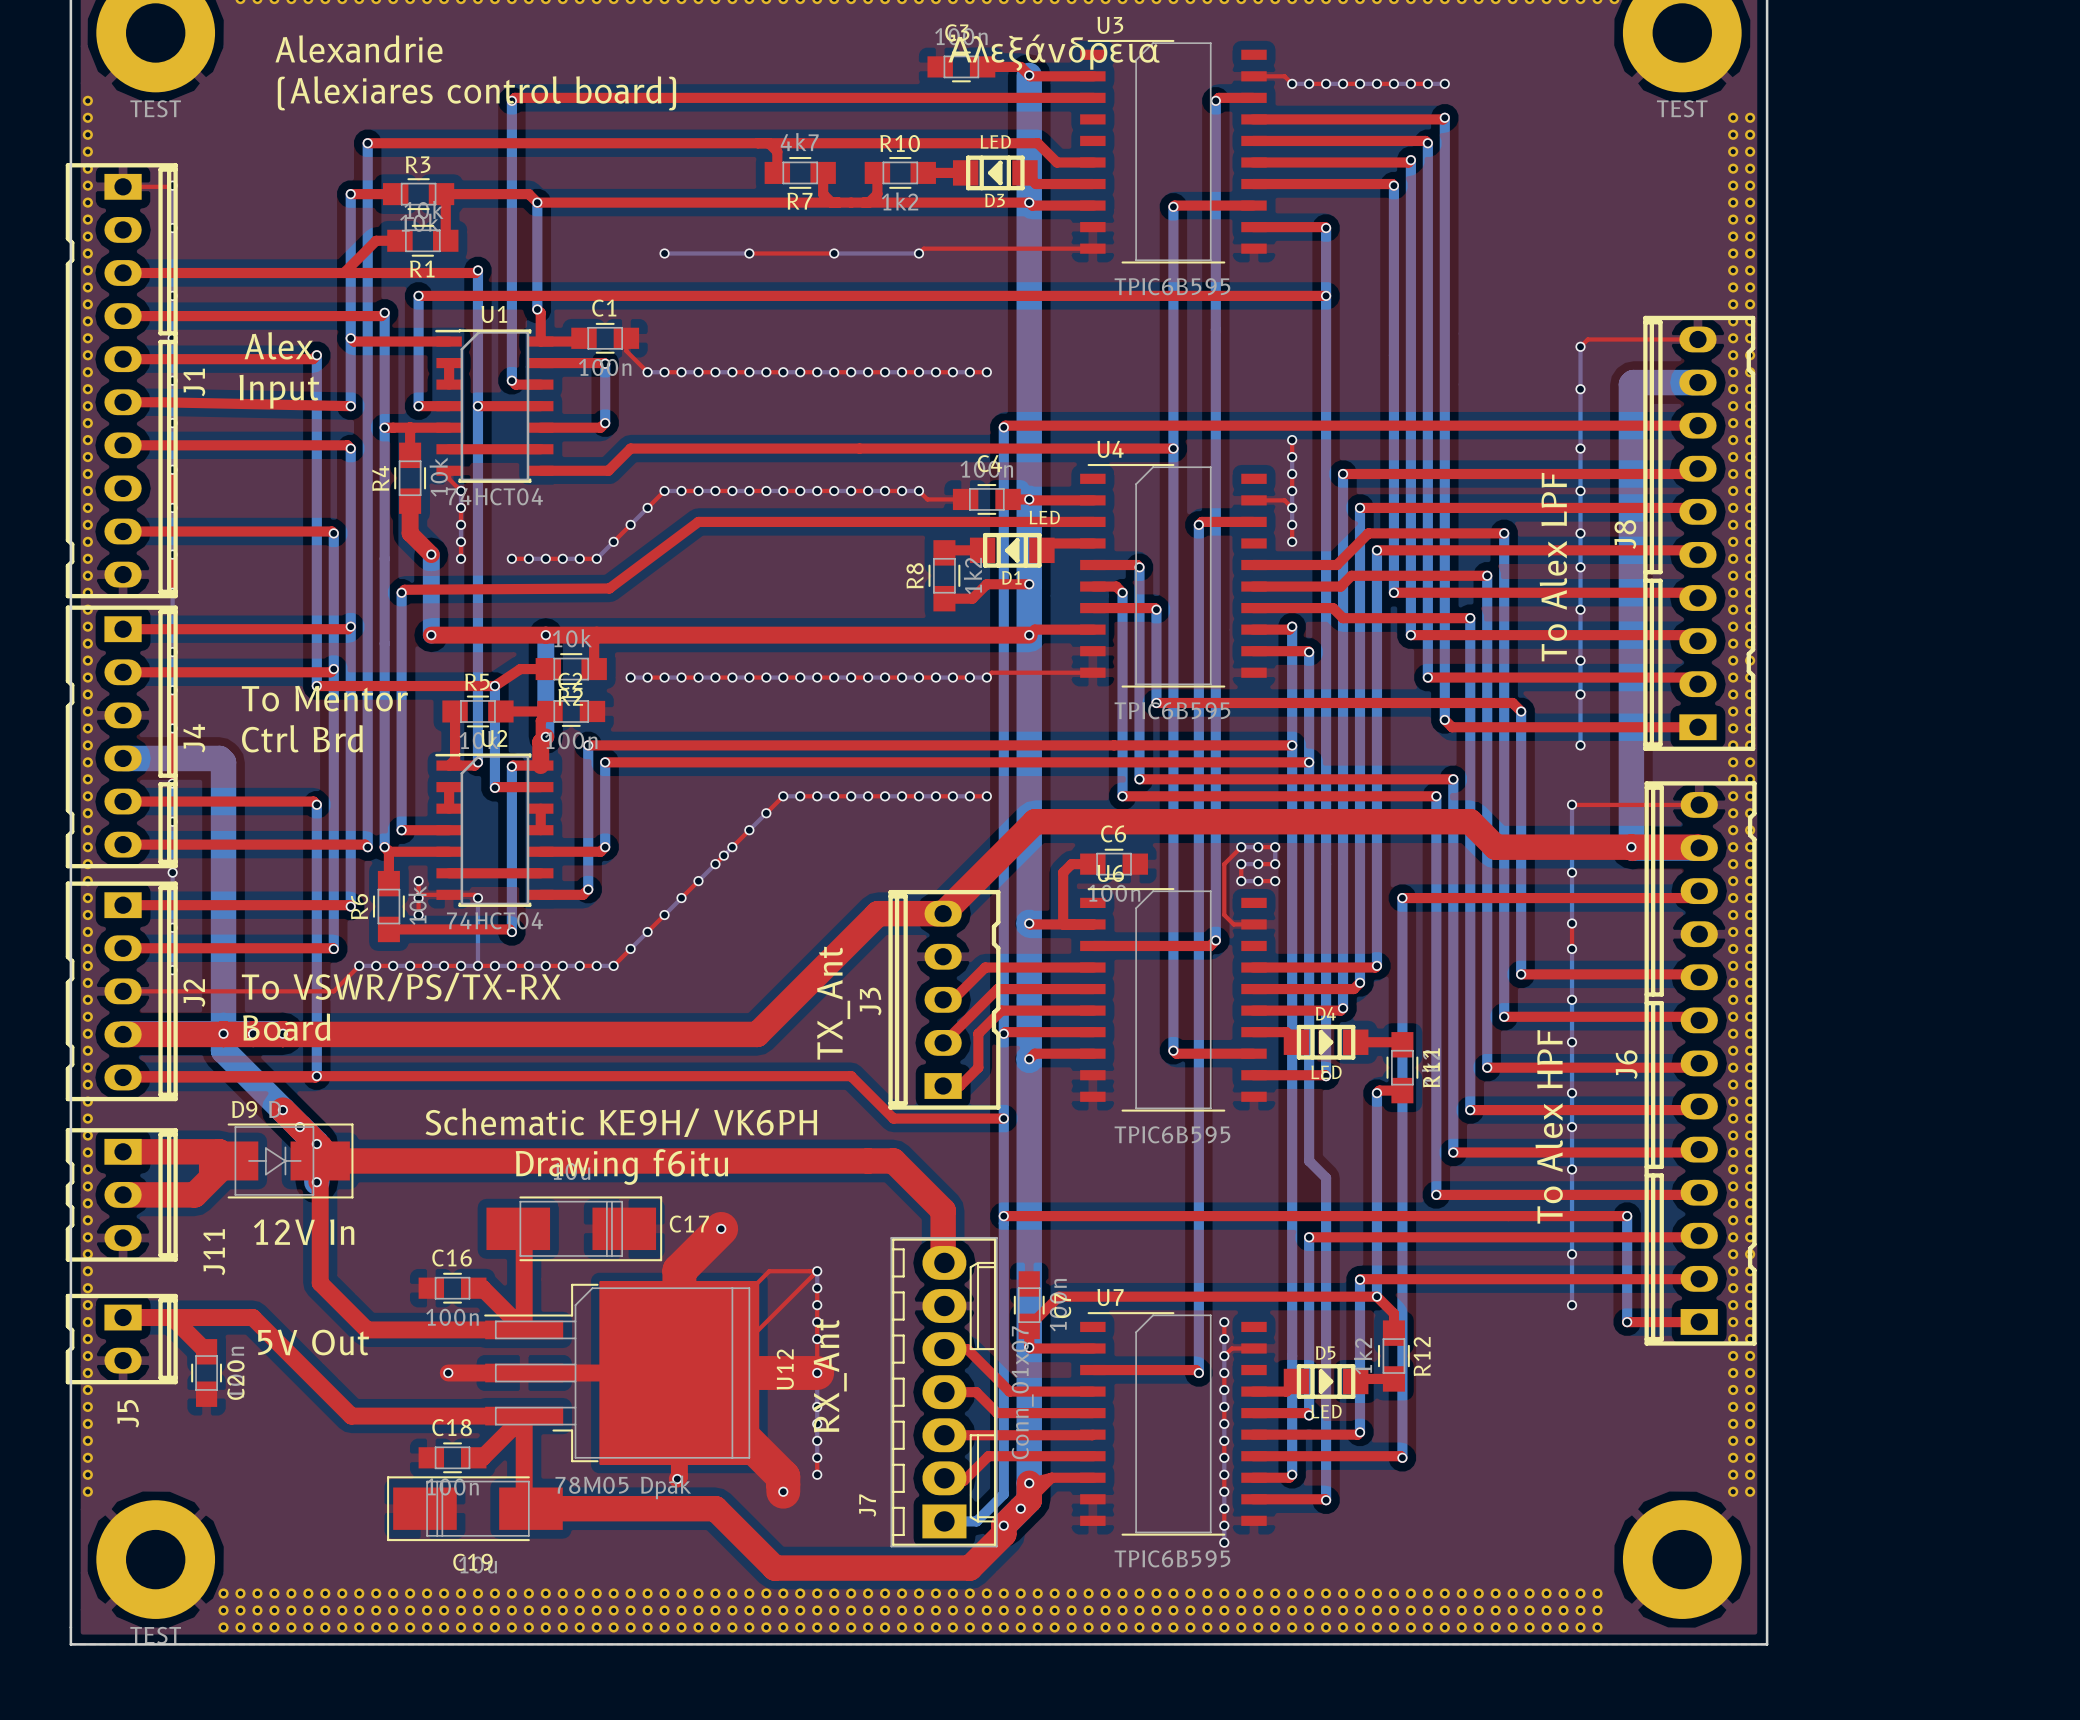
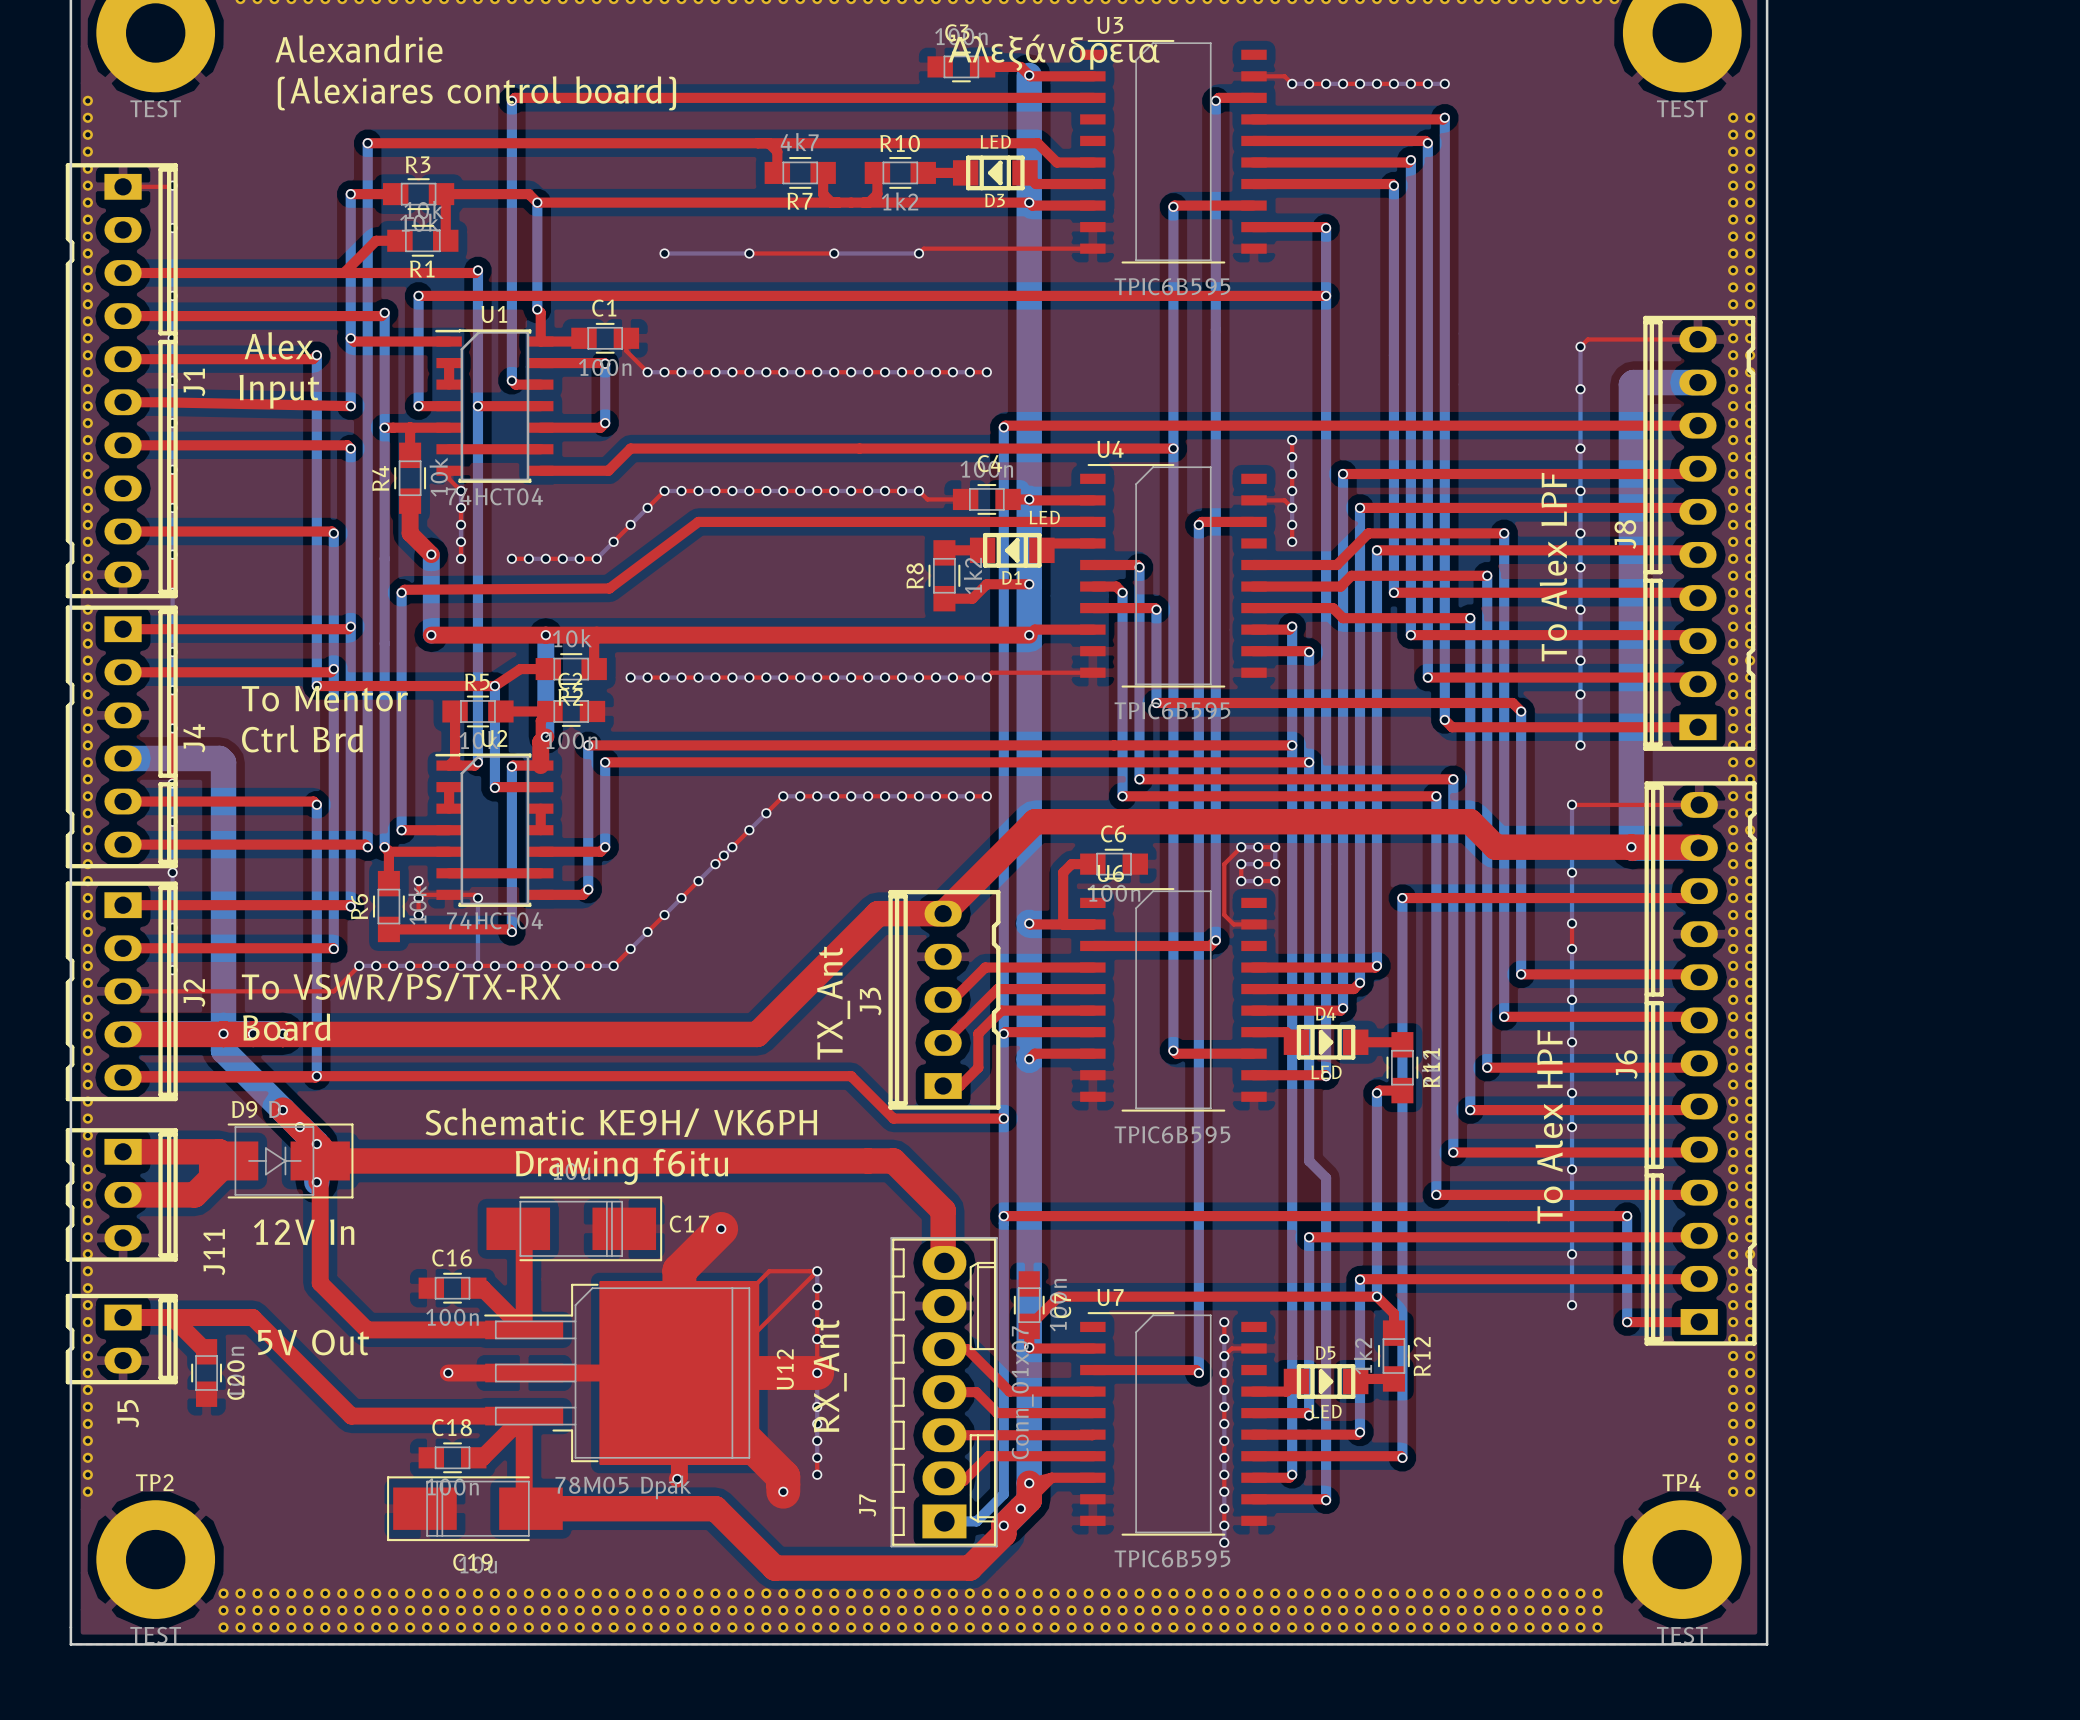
TP2 name: none -> TP2 (154, 1482)
TP4 name: none -> TP4 (1681, 1482)
TP4 value: none -> TEST (1682, 1635)

